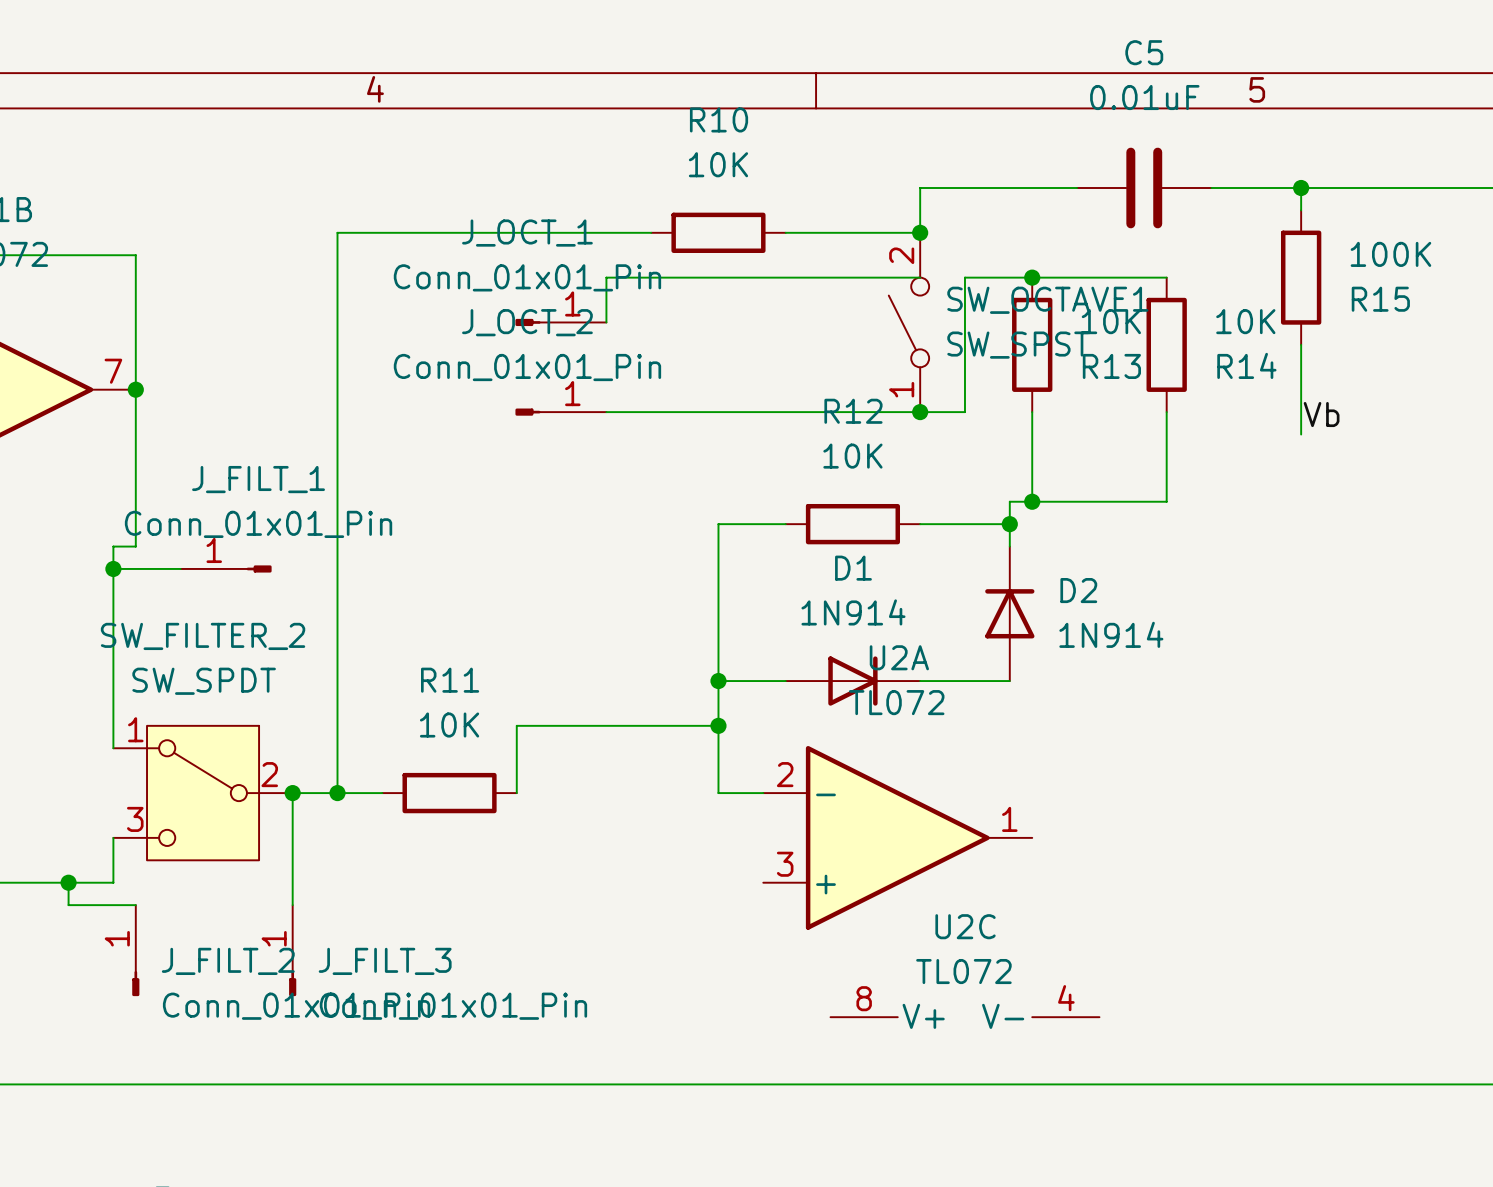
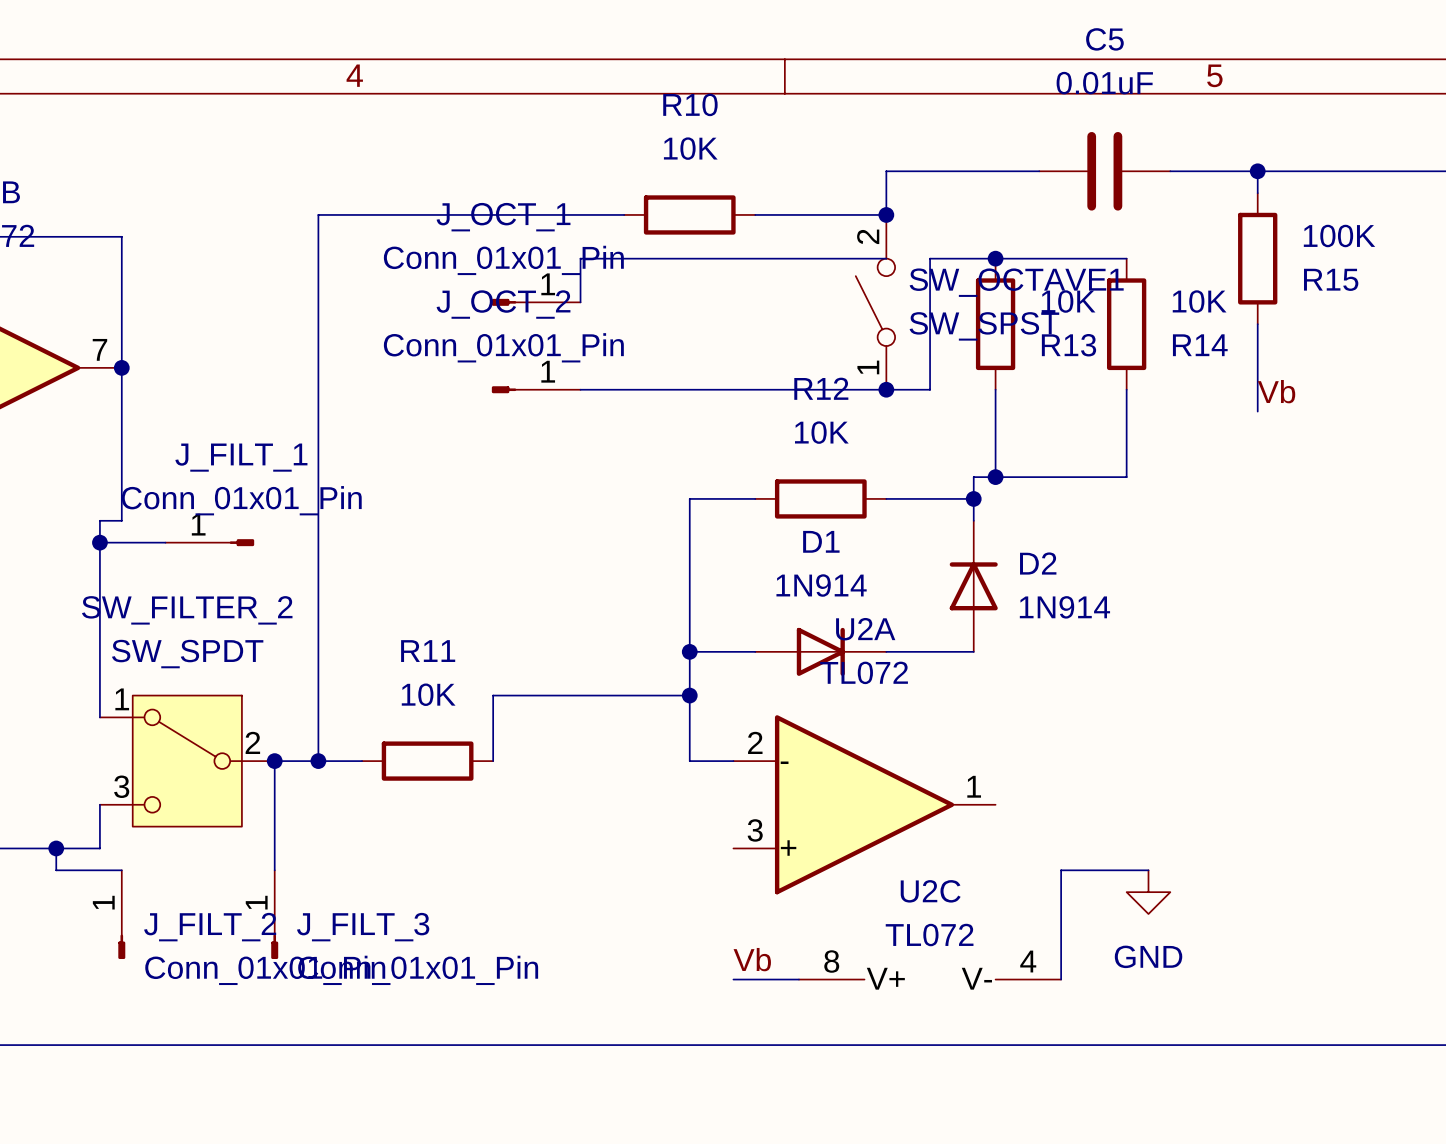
wire: none -> (1148, 870) (1061, 870) (1061, 979)
power symbol: none -> GND (1148, 892)
label: none -> Vb (752, 959)
wire: none -> (733, 979) (798, 979)

